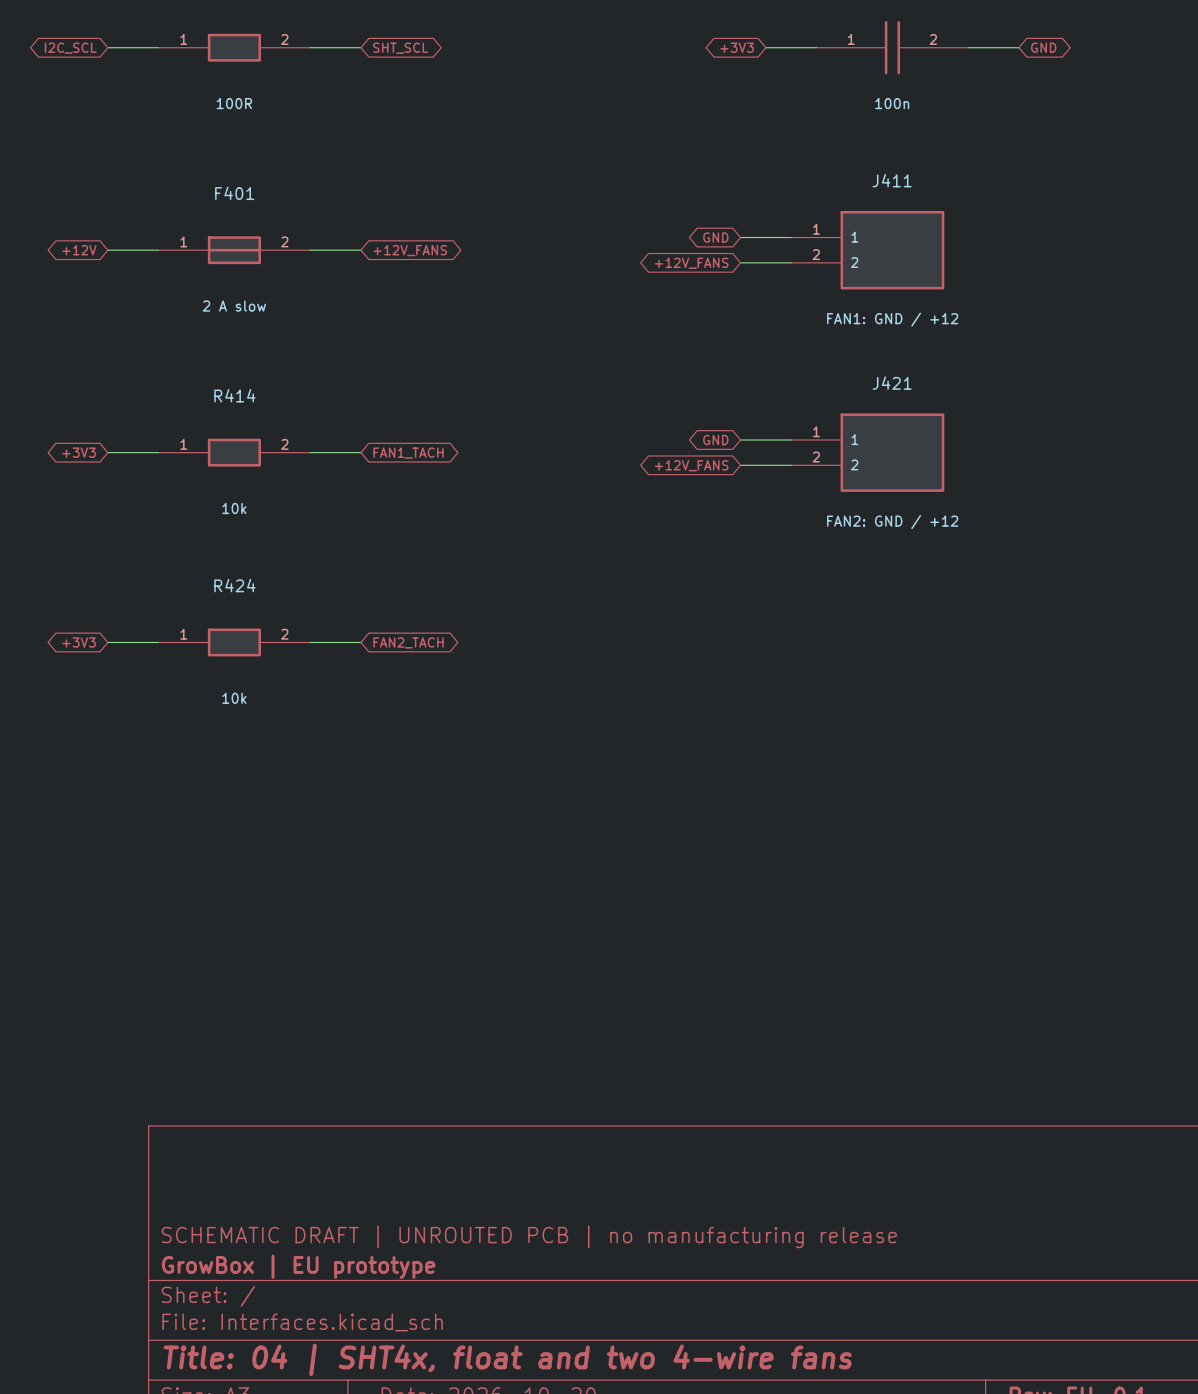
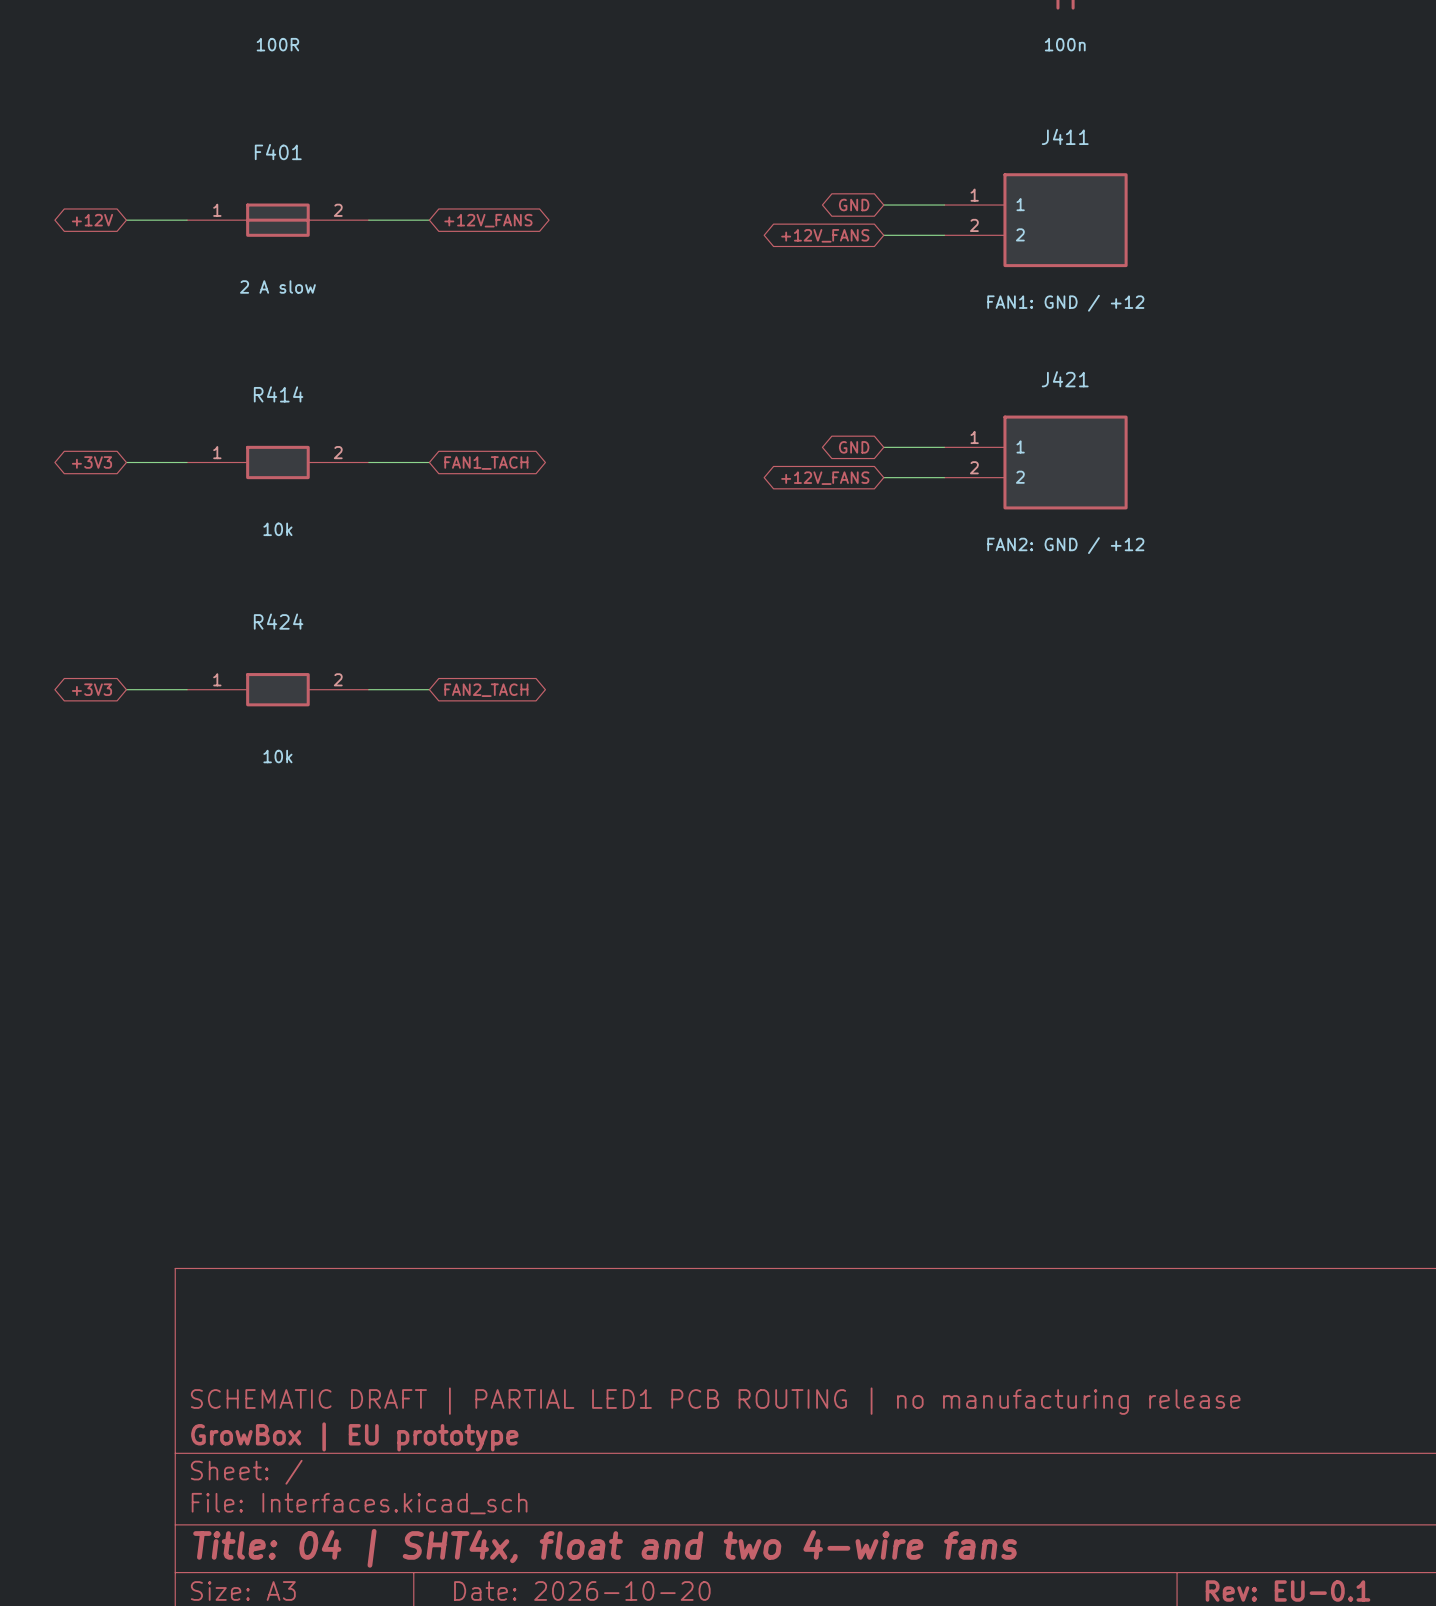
title block: SCHEMATIC DRAFT | UNROUTED PCB | no manufacturing release (529, 1236) -> SCHEMATIC DRAFT | PARTIAL LED1 PCB ROUTING | no manufacturing release (715, 1401)

